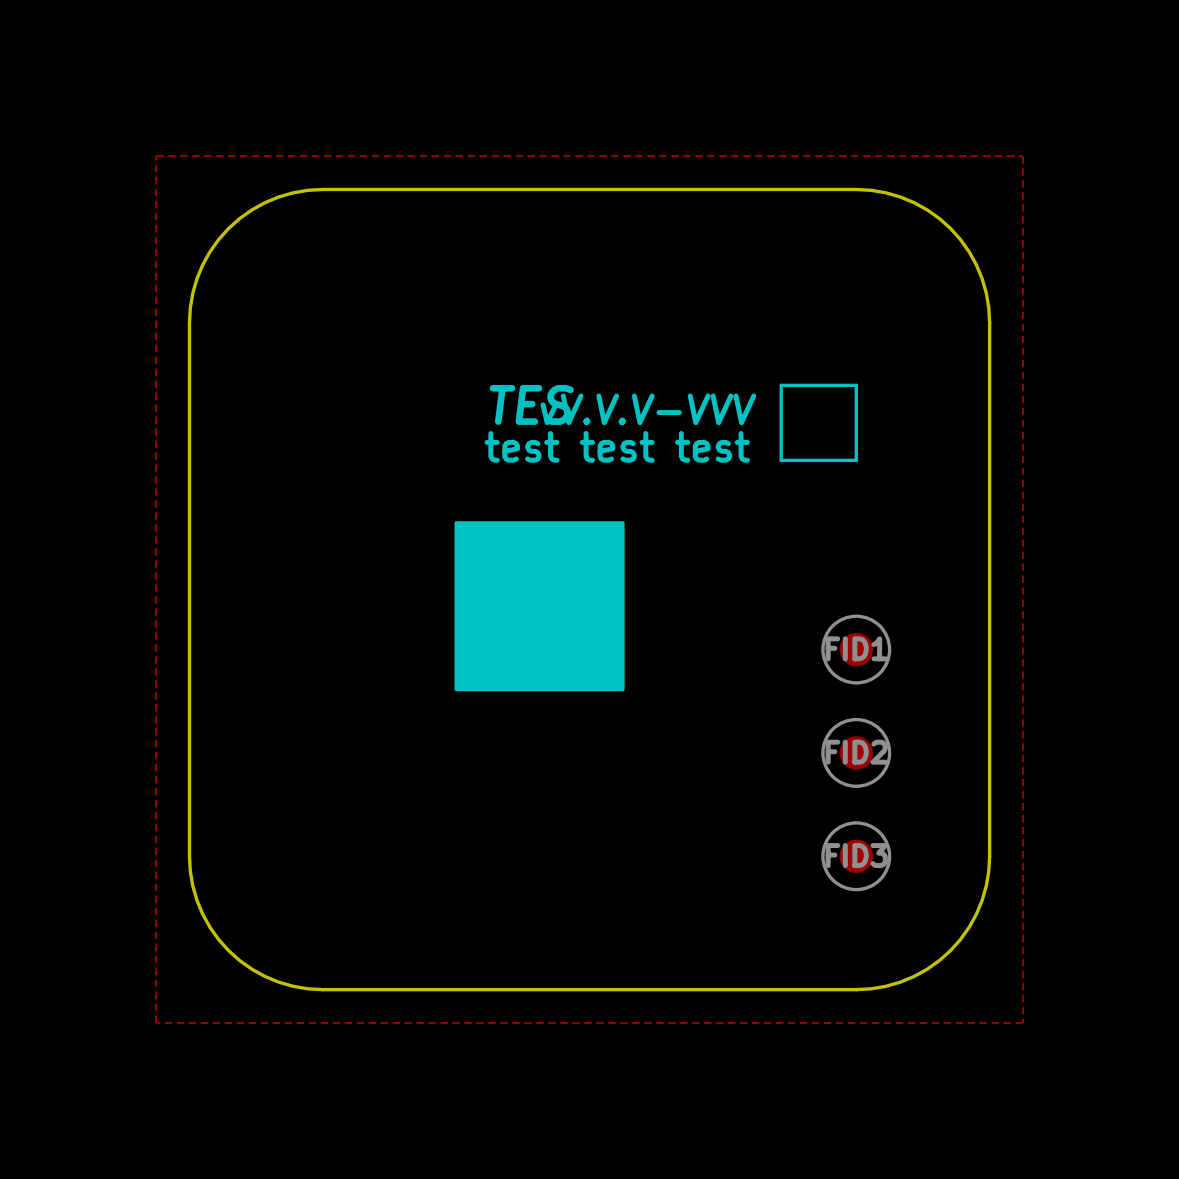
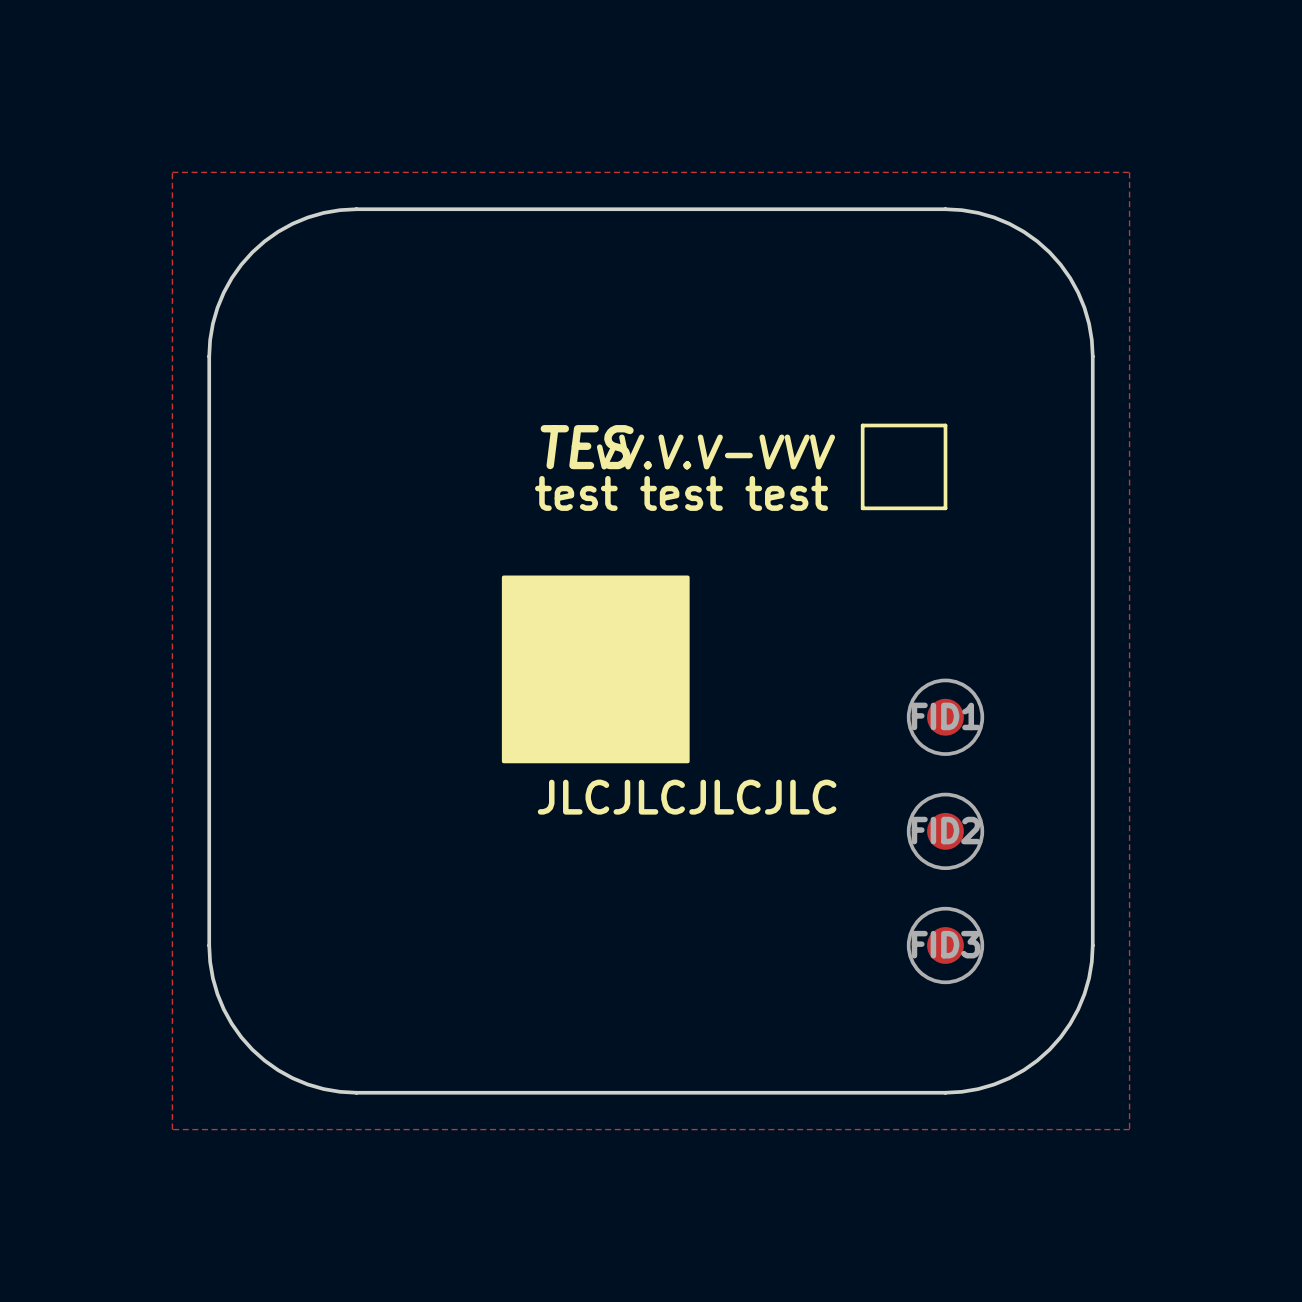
text: none -> JLCJLCJLCJLC (687, 797)

